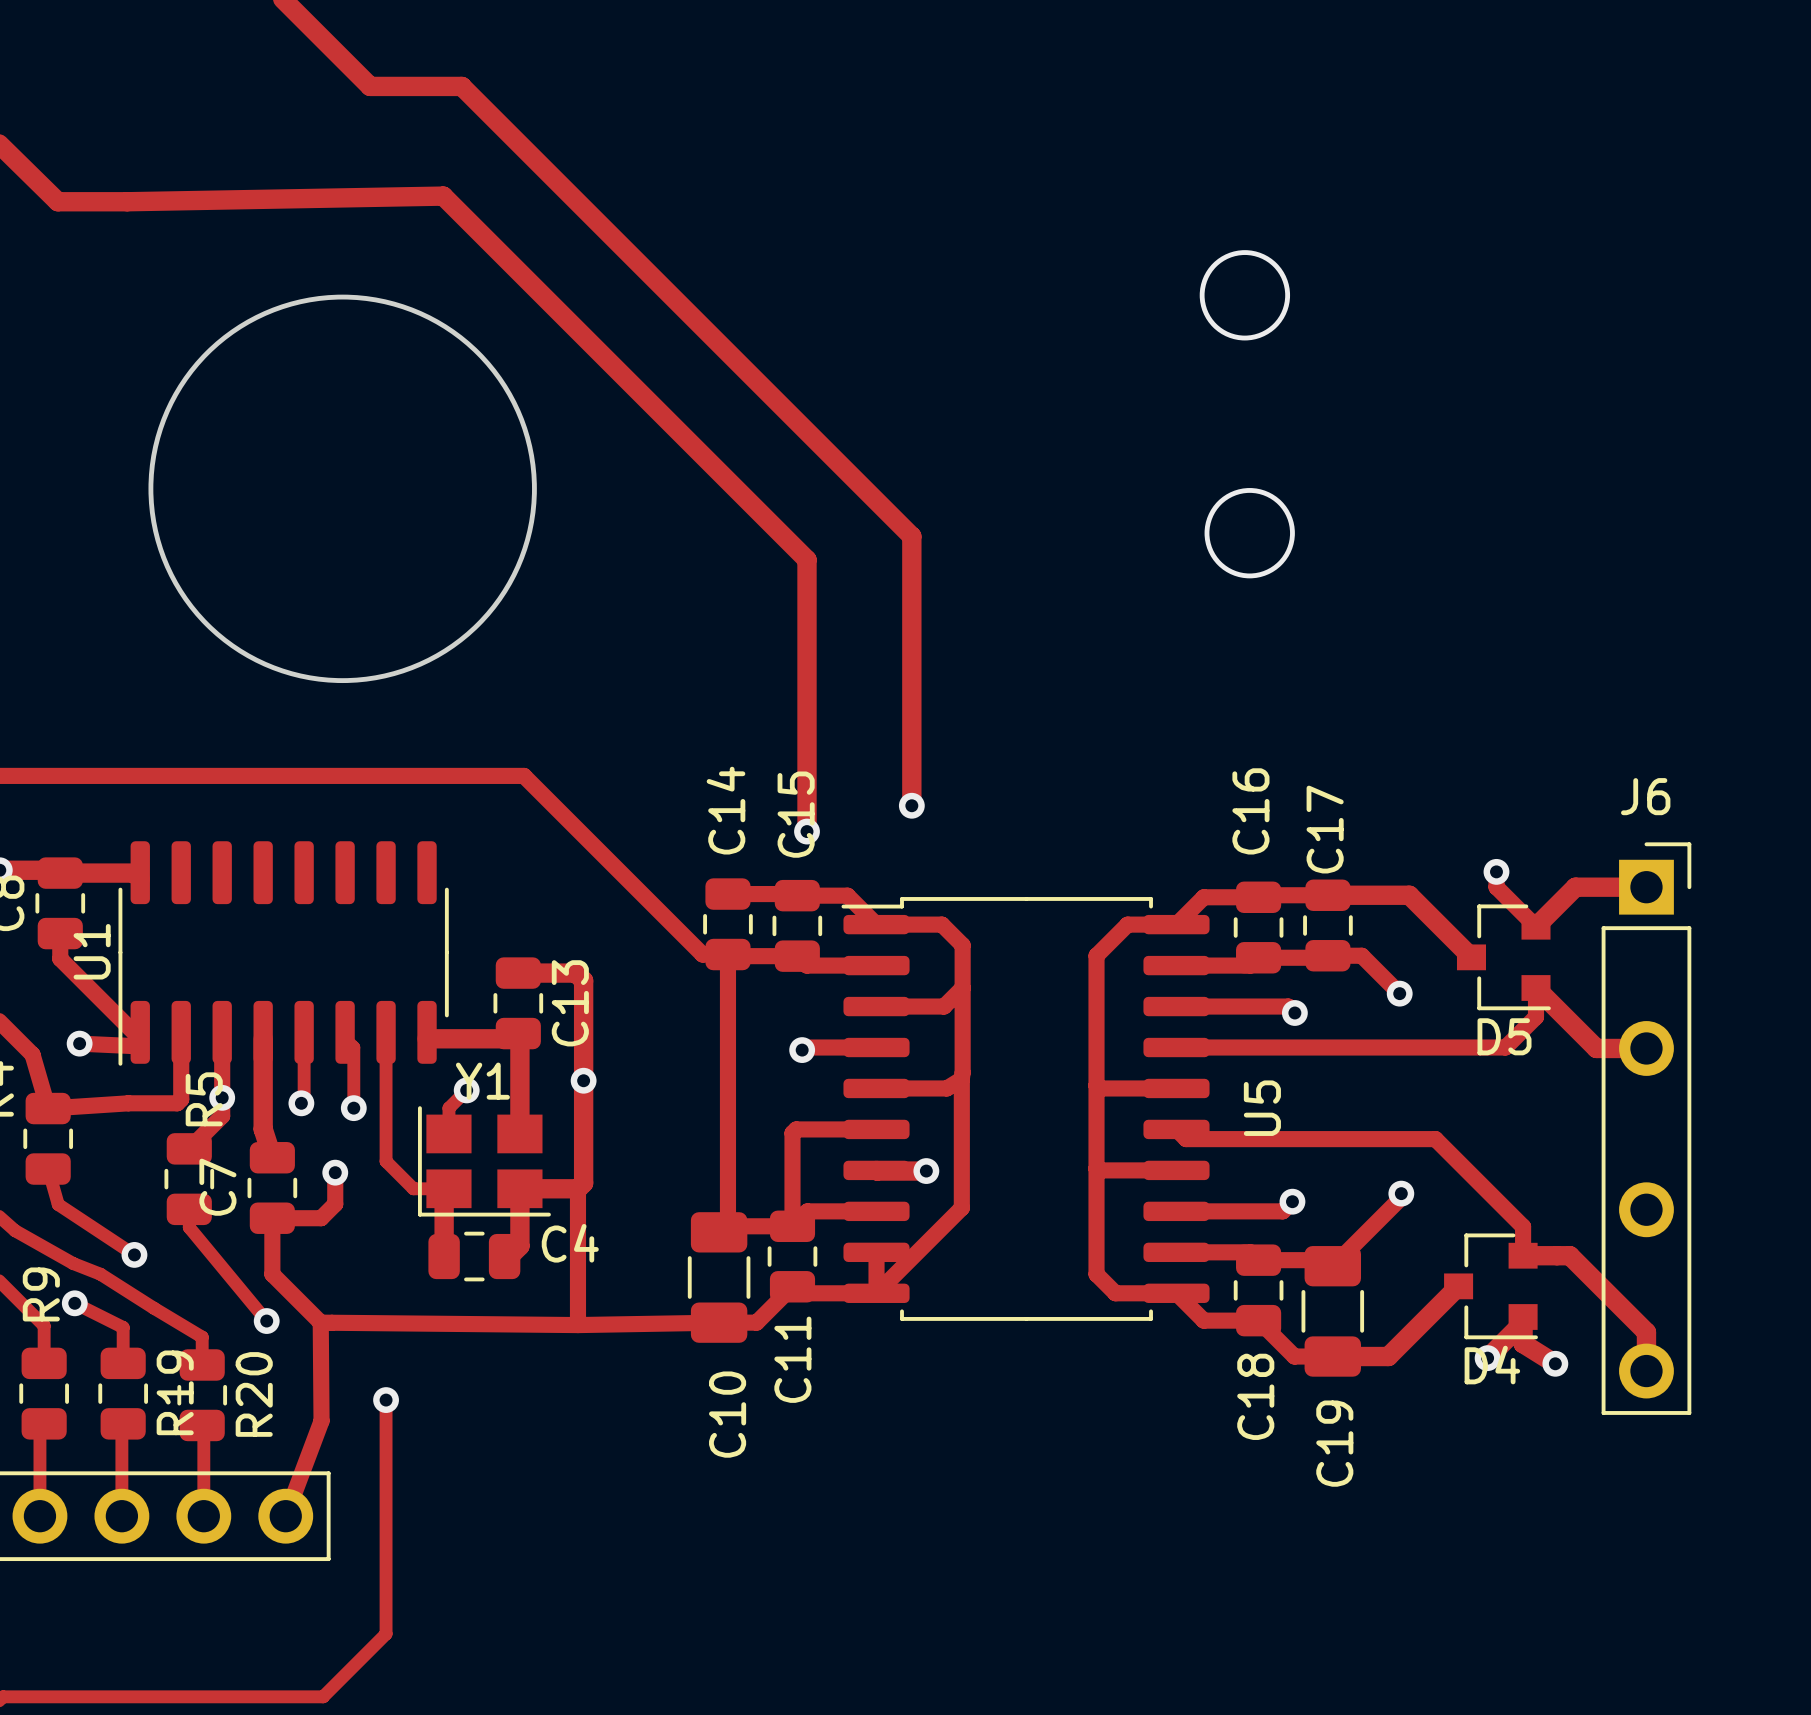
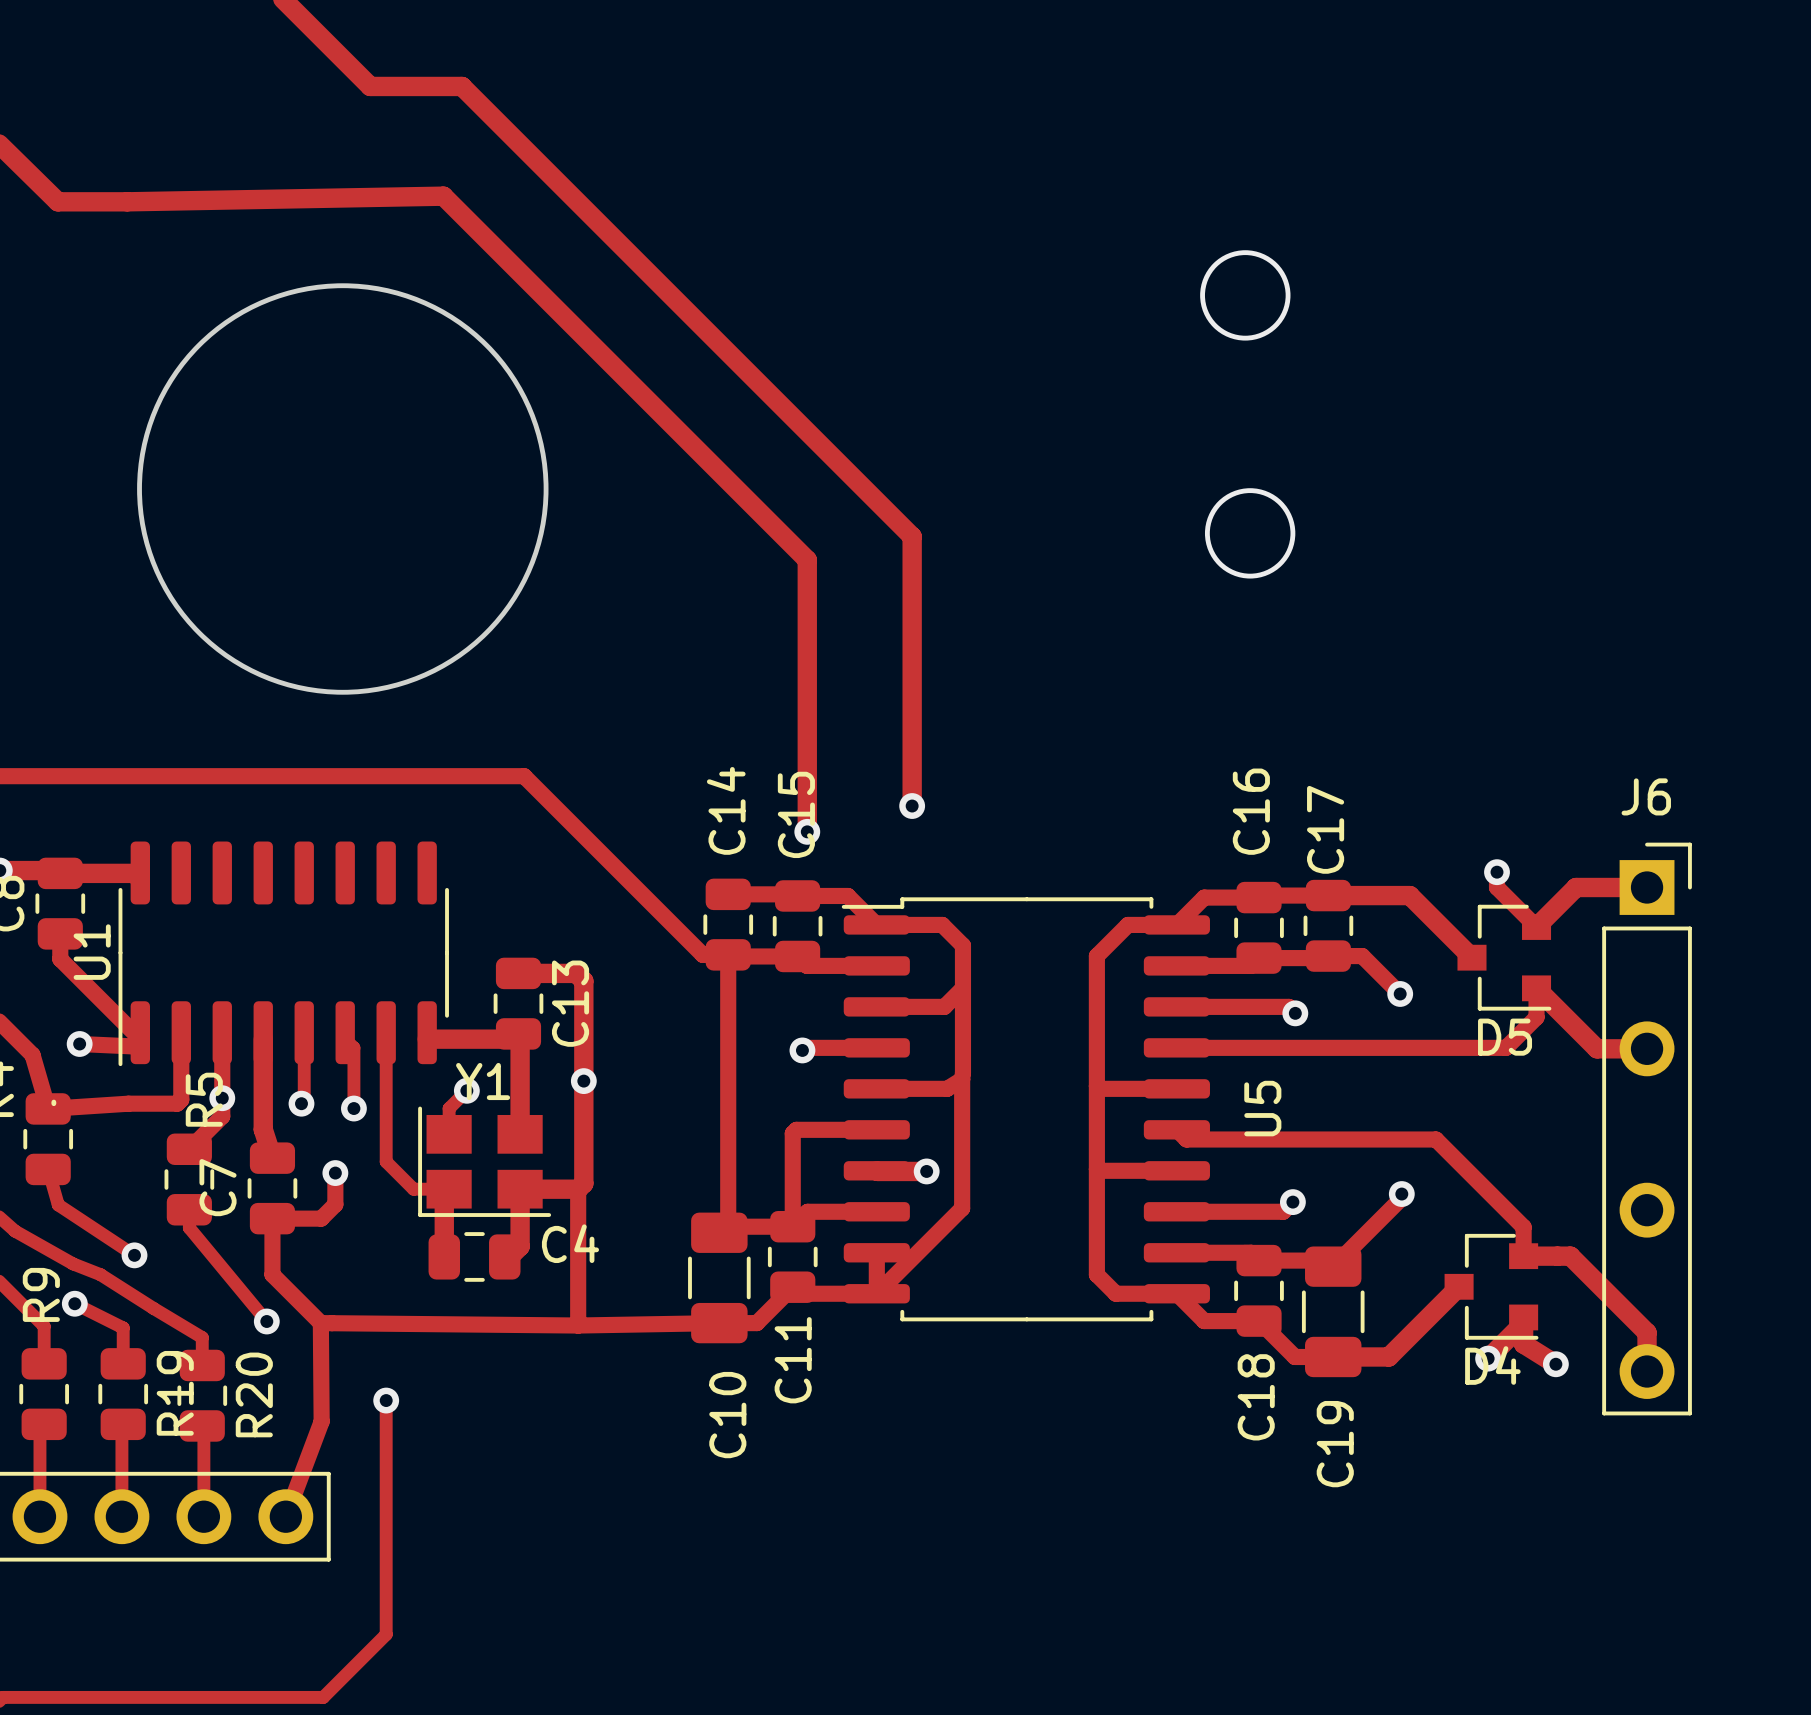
round board edge size: [148, 294, 537, 684] -> [137, 283, 549, 695]
line: none -> (53, 1102) (53, 1103)

